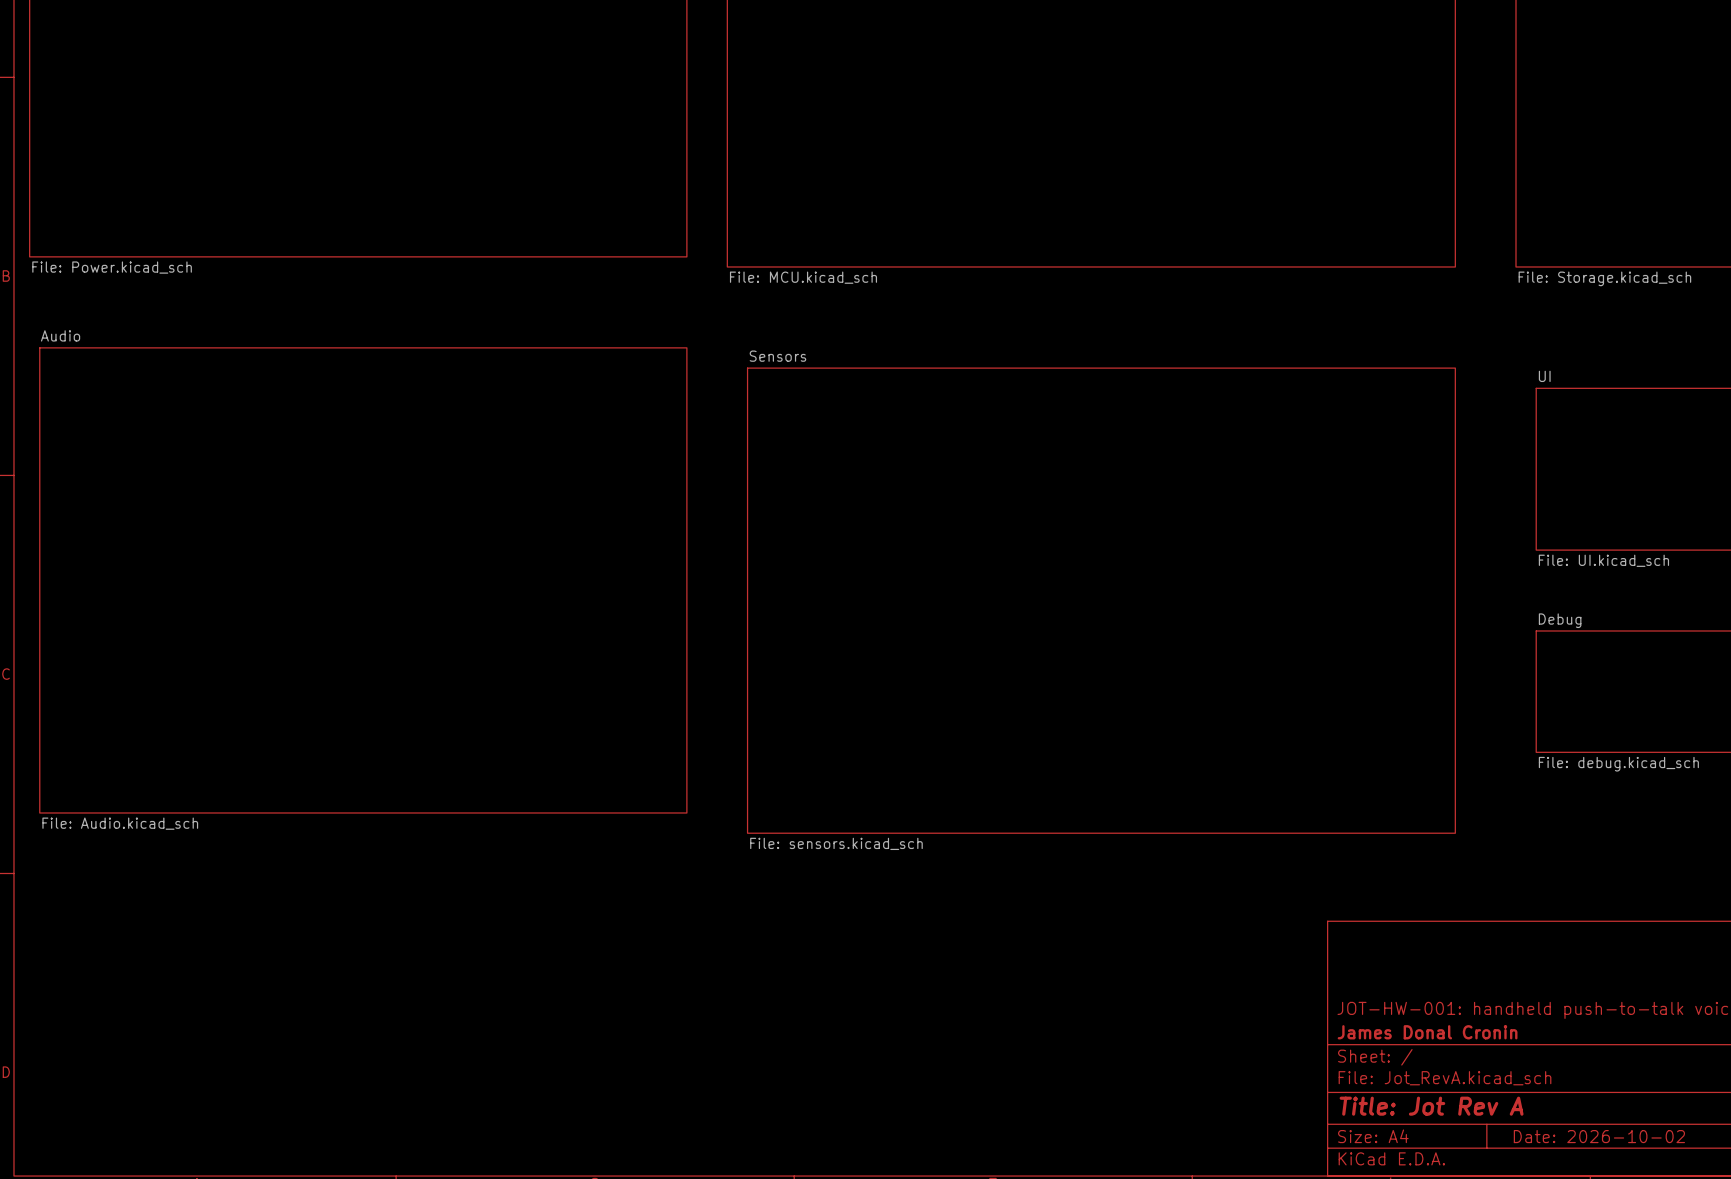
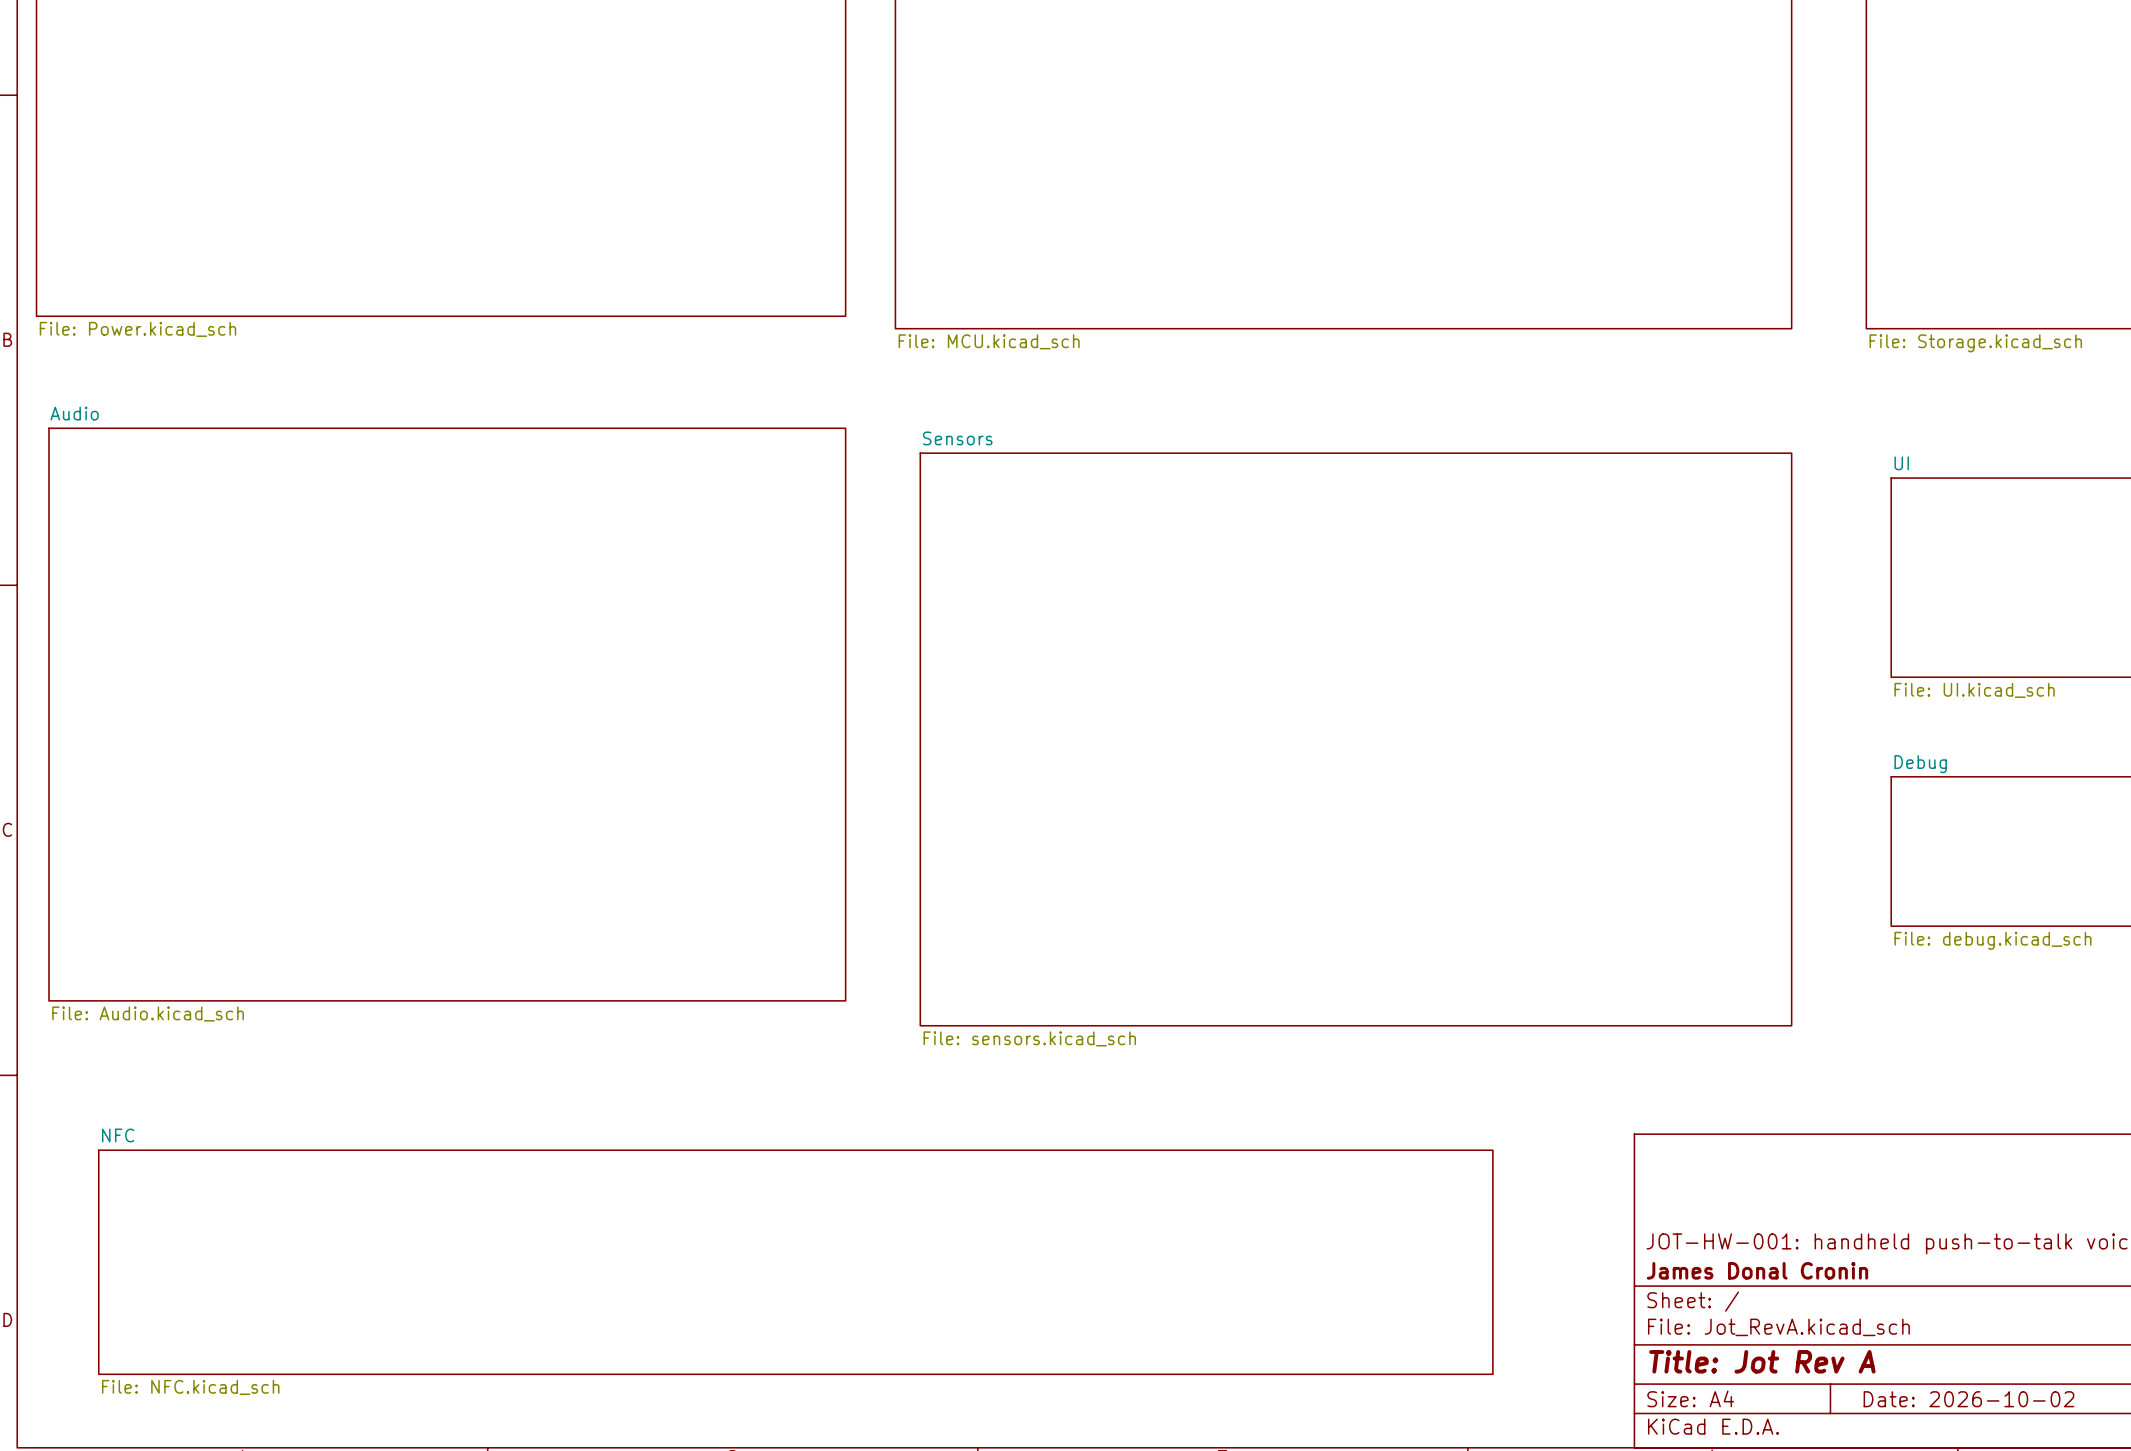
sheet NFC: none -> File: NFC.kicad_sch (795, 1262)

